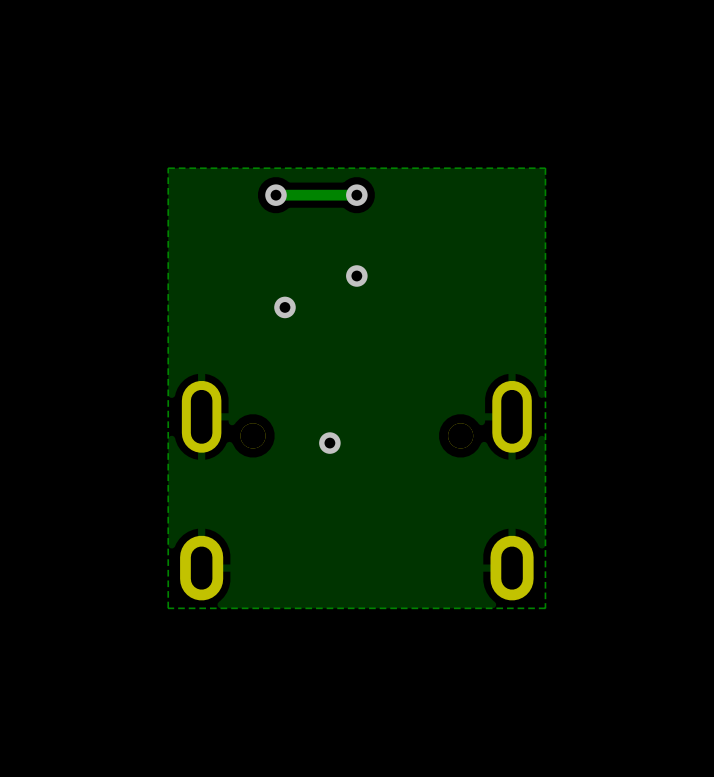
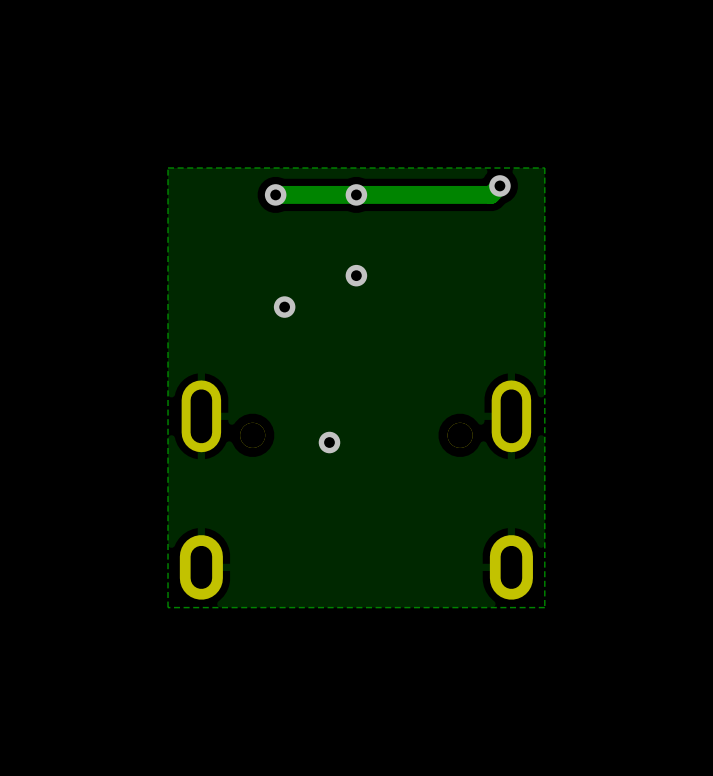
track: none -> (499, 185) (490, 194) (356, 194)
via: none -> (499, 185)
track width: thin (356, 195) (276, 195) -> thick (356, 194) (275, 194)

